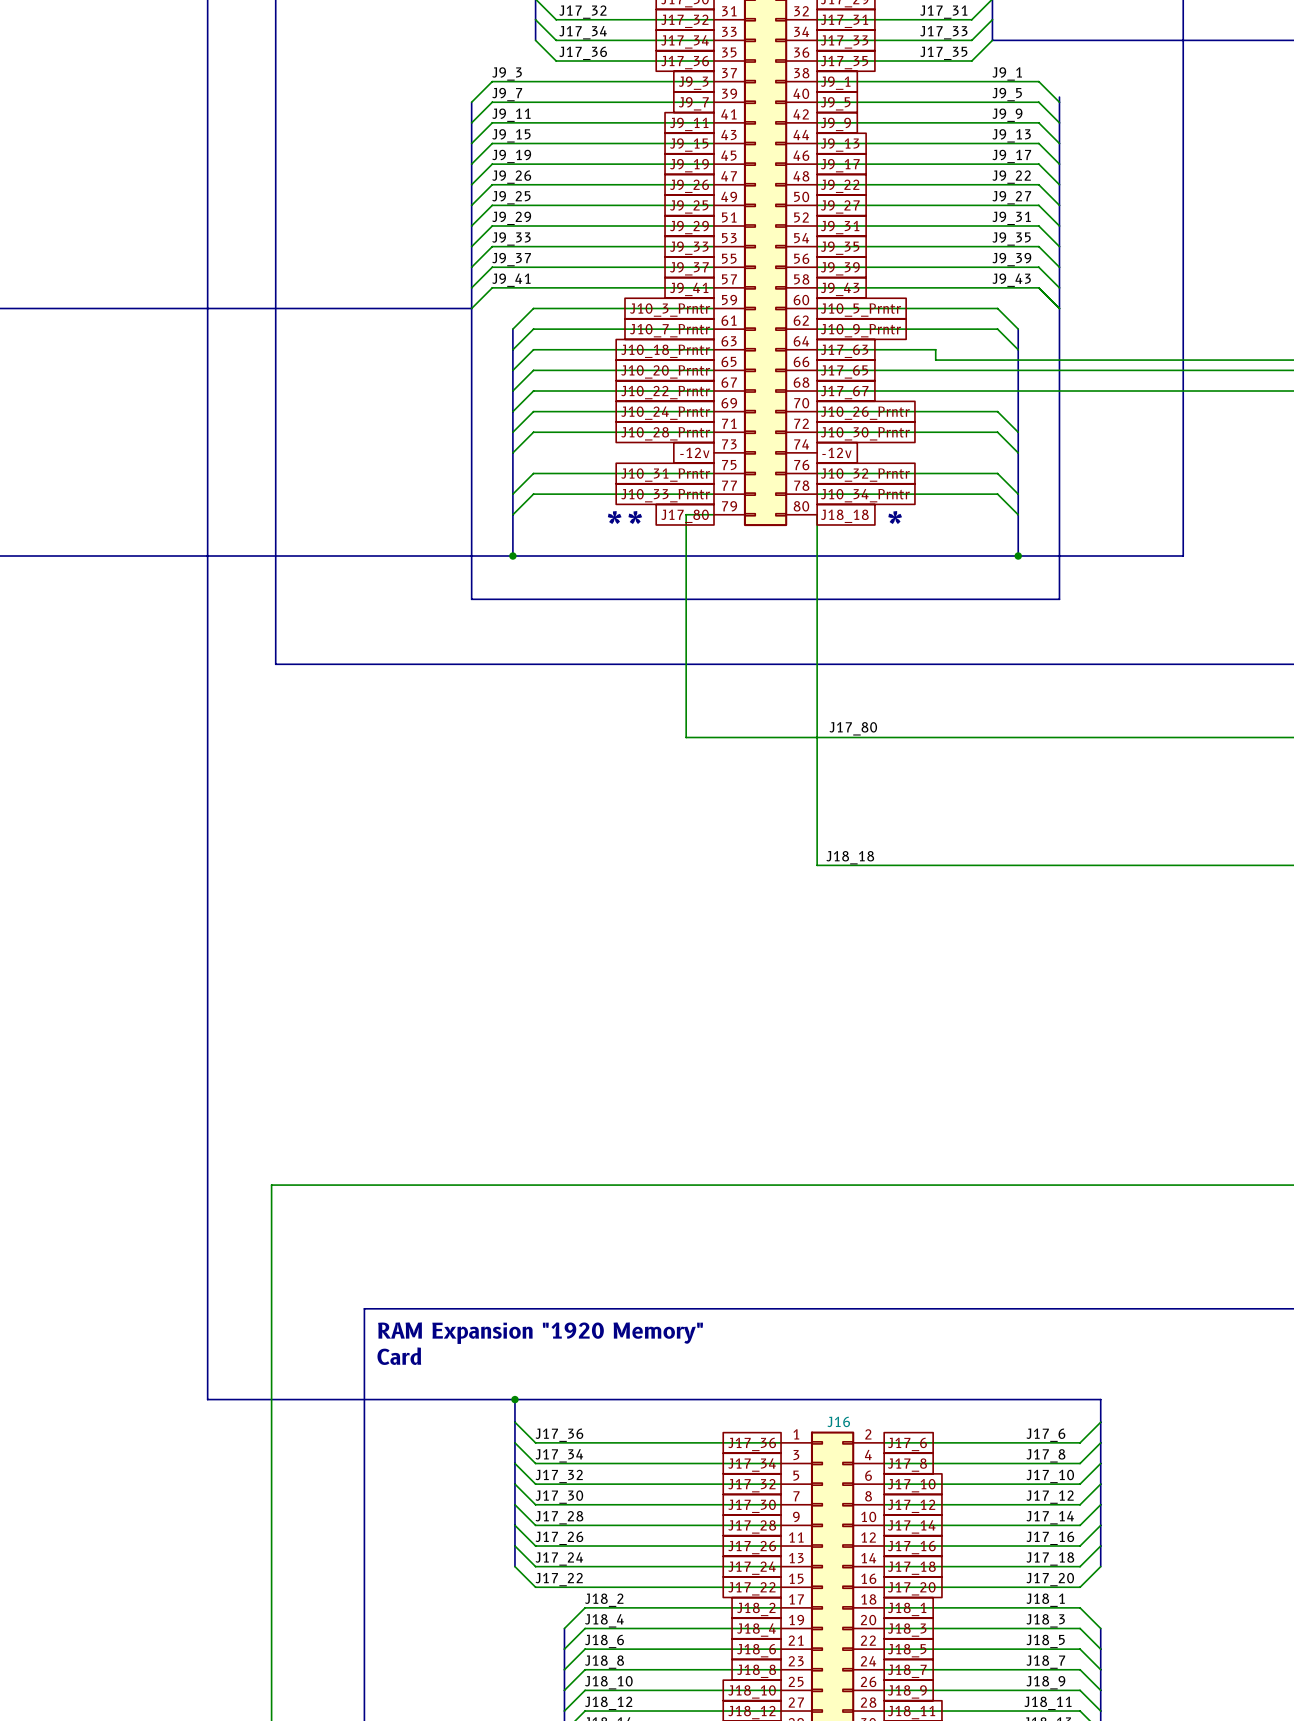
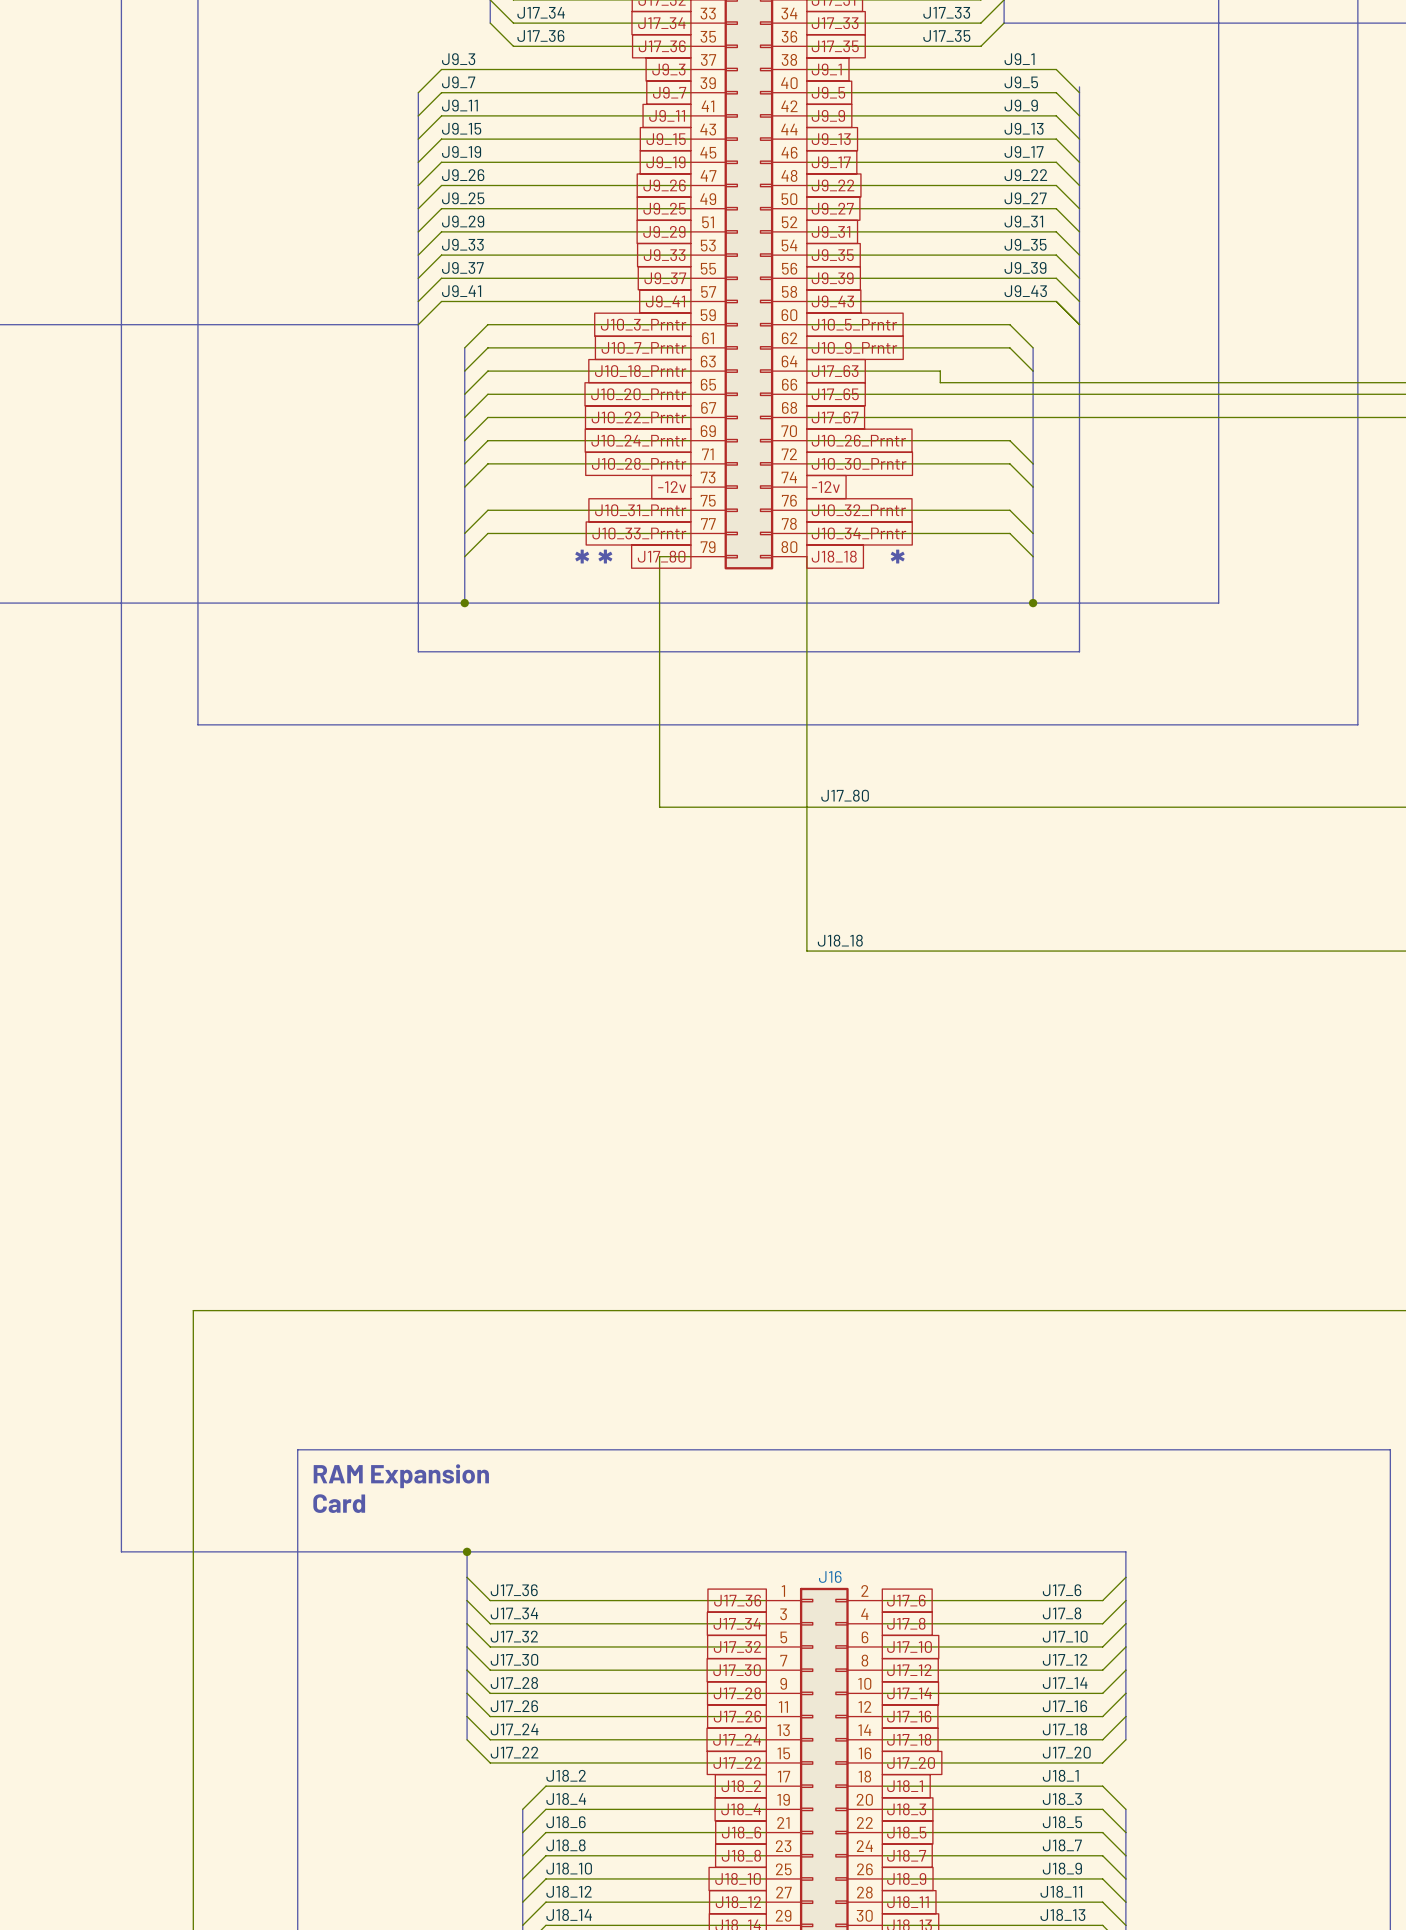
text: RAM Expansion "1920 Memory" (540, 1333) -> RAM Expansion (401, 1476)

